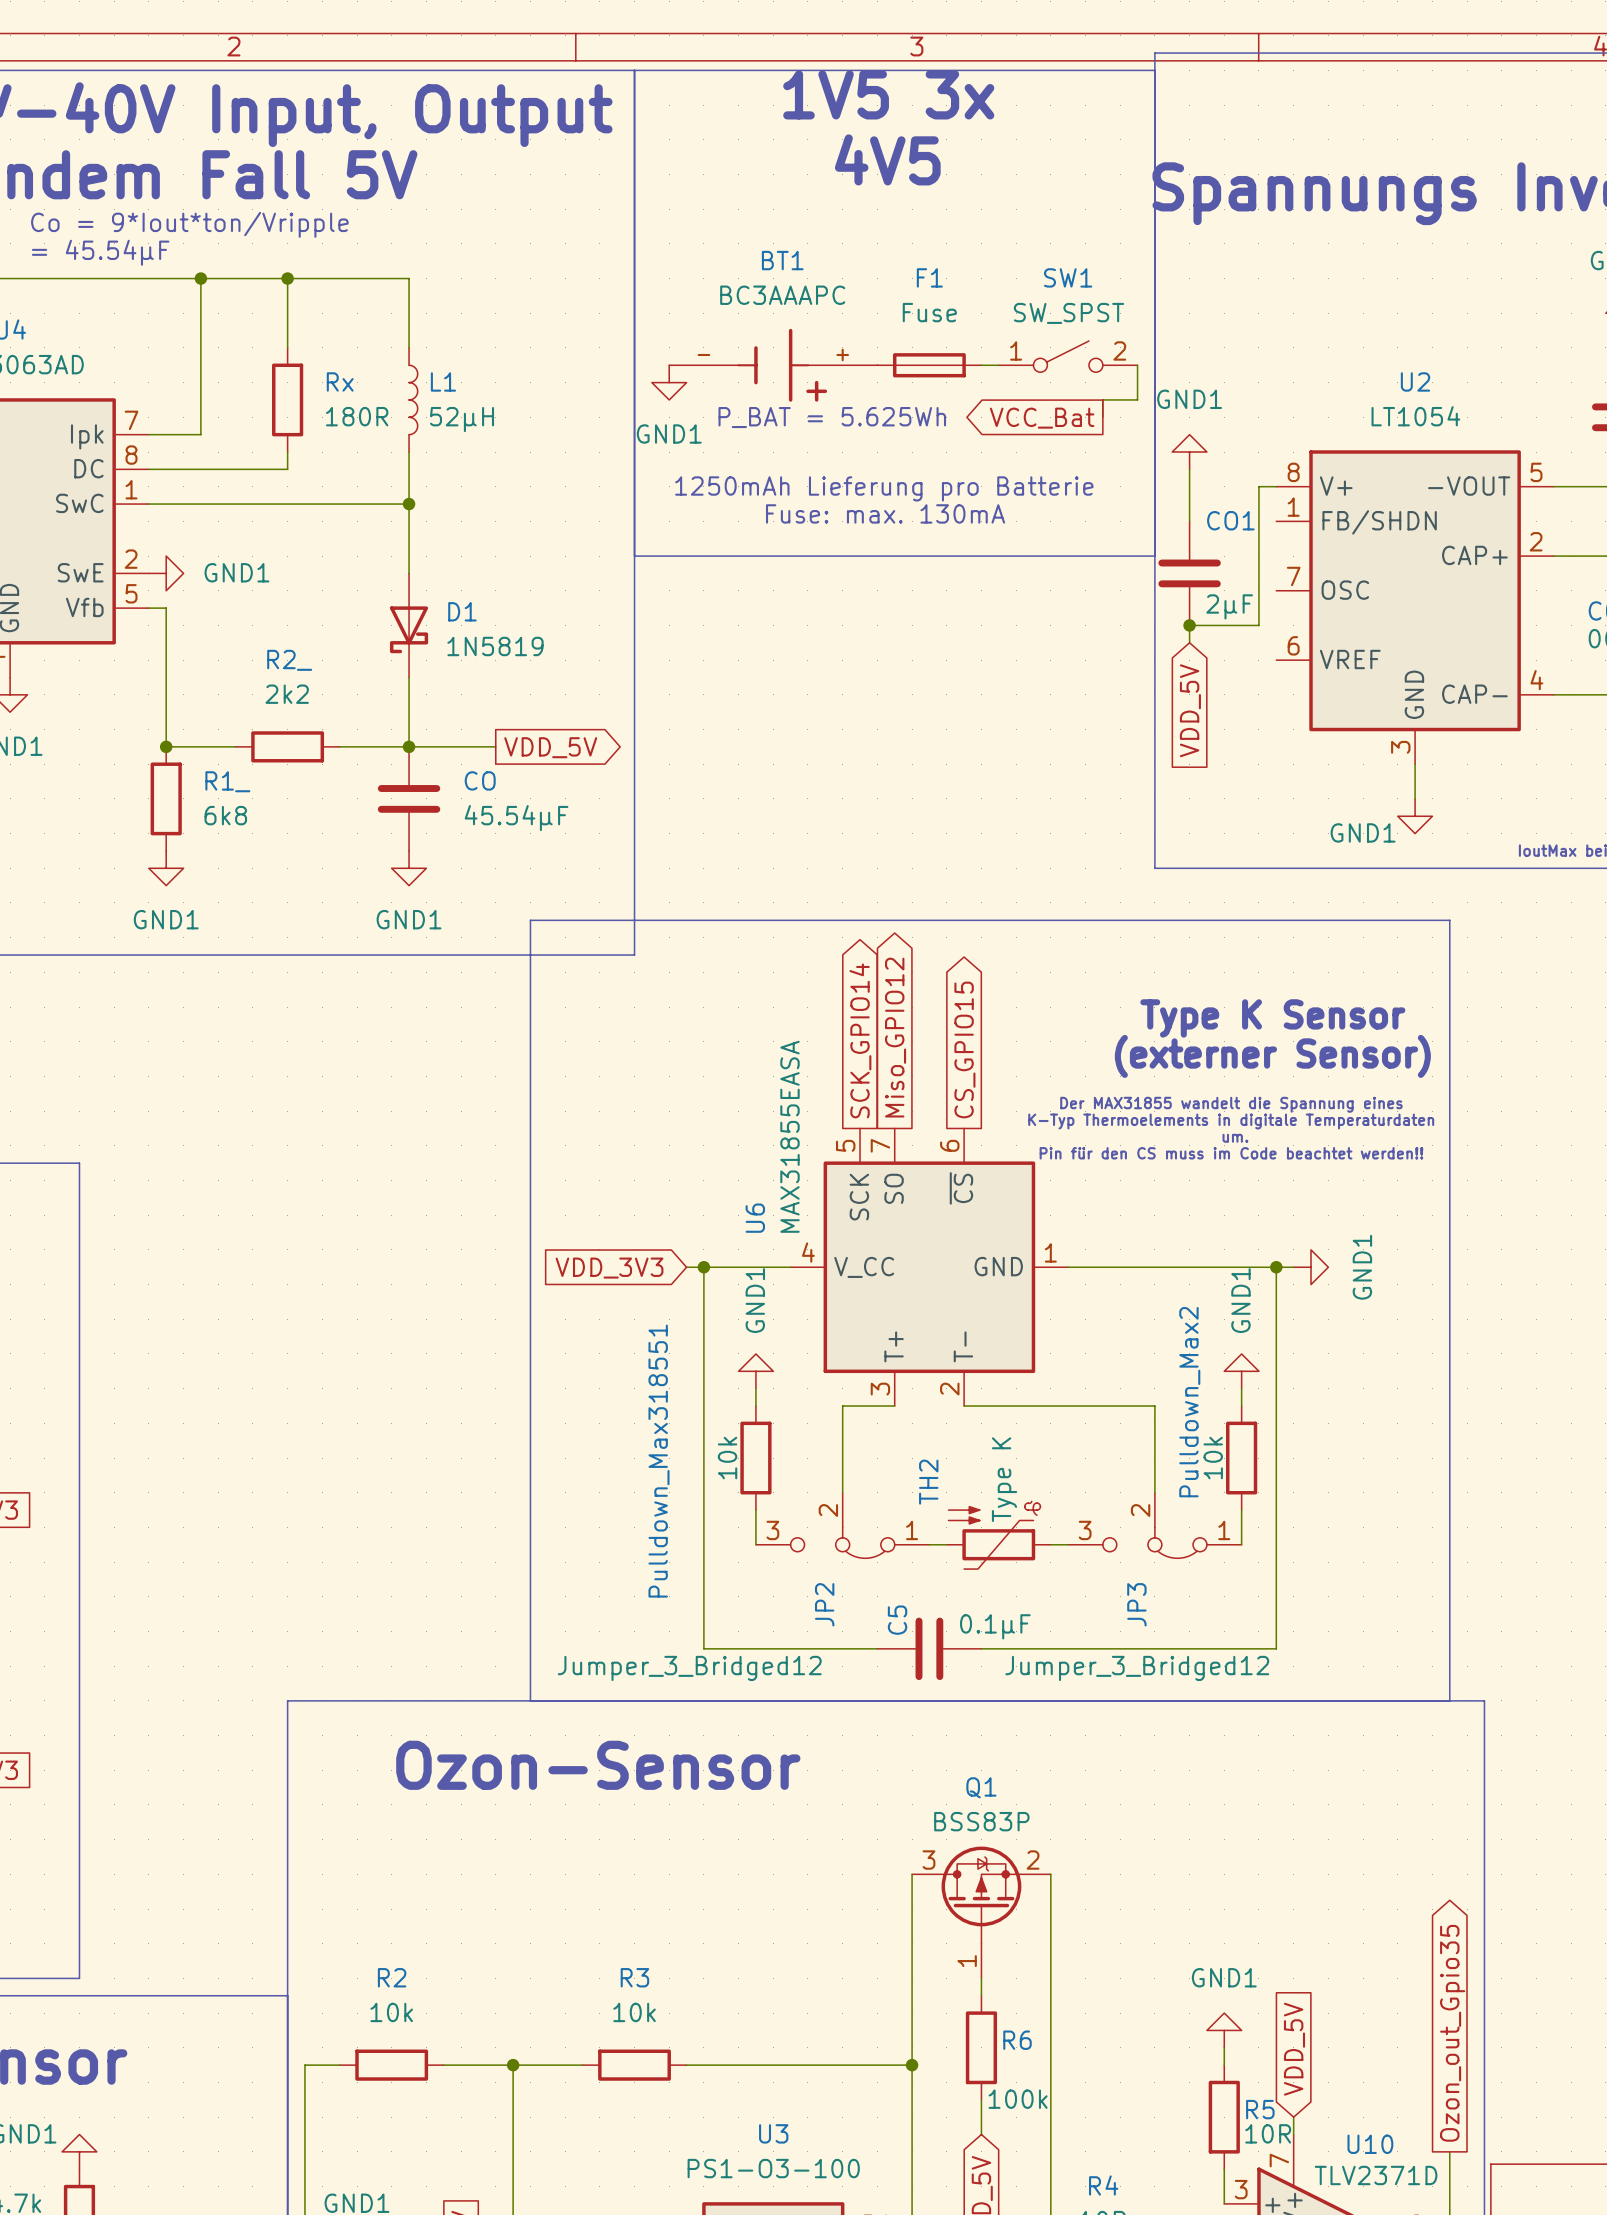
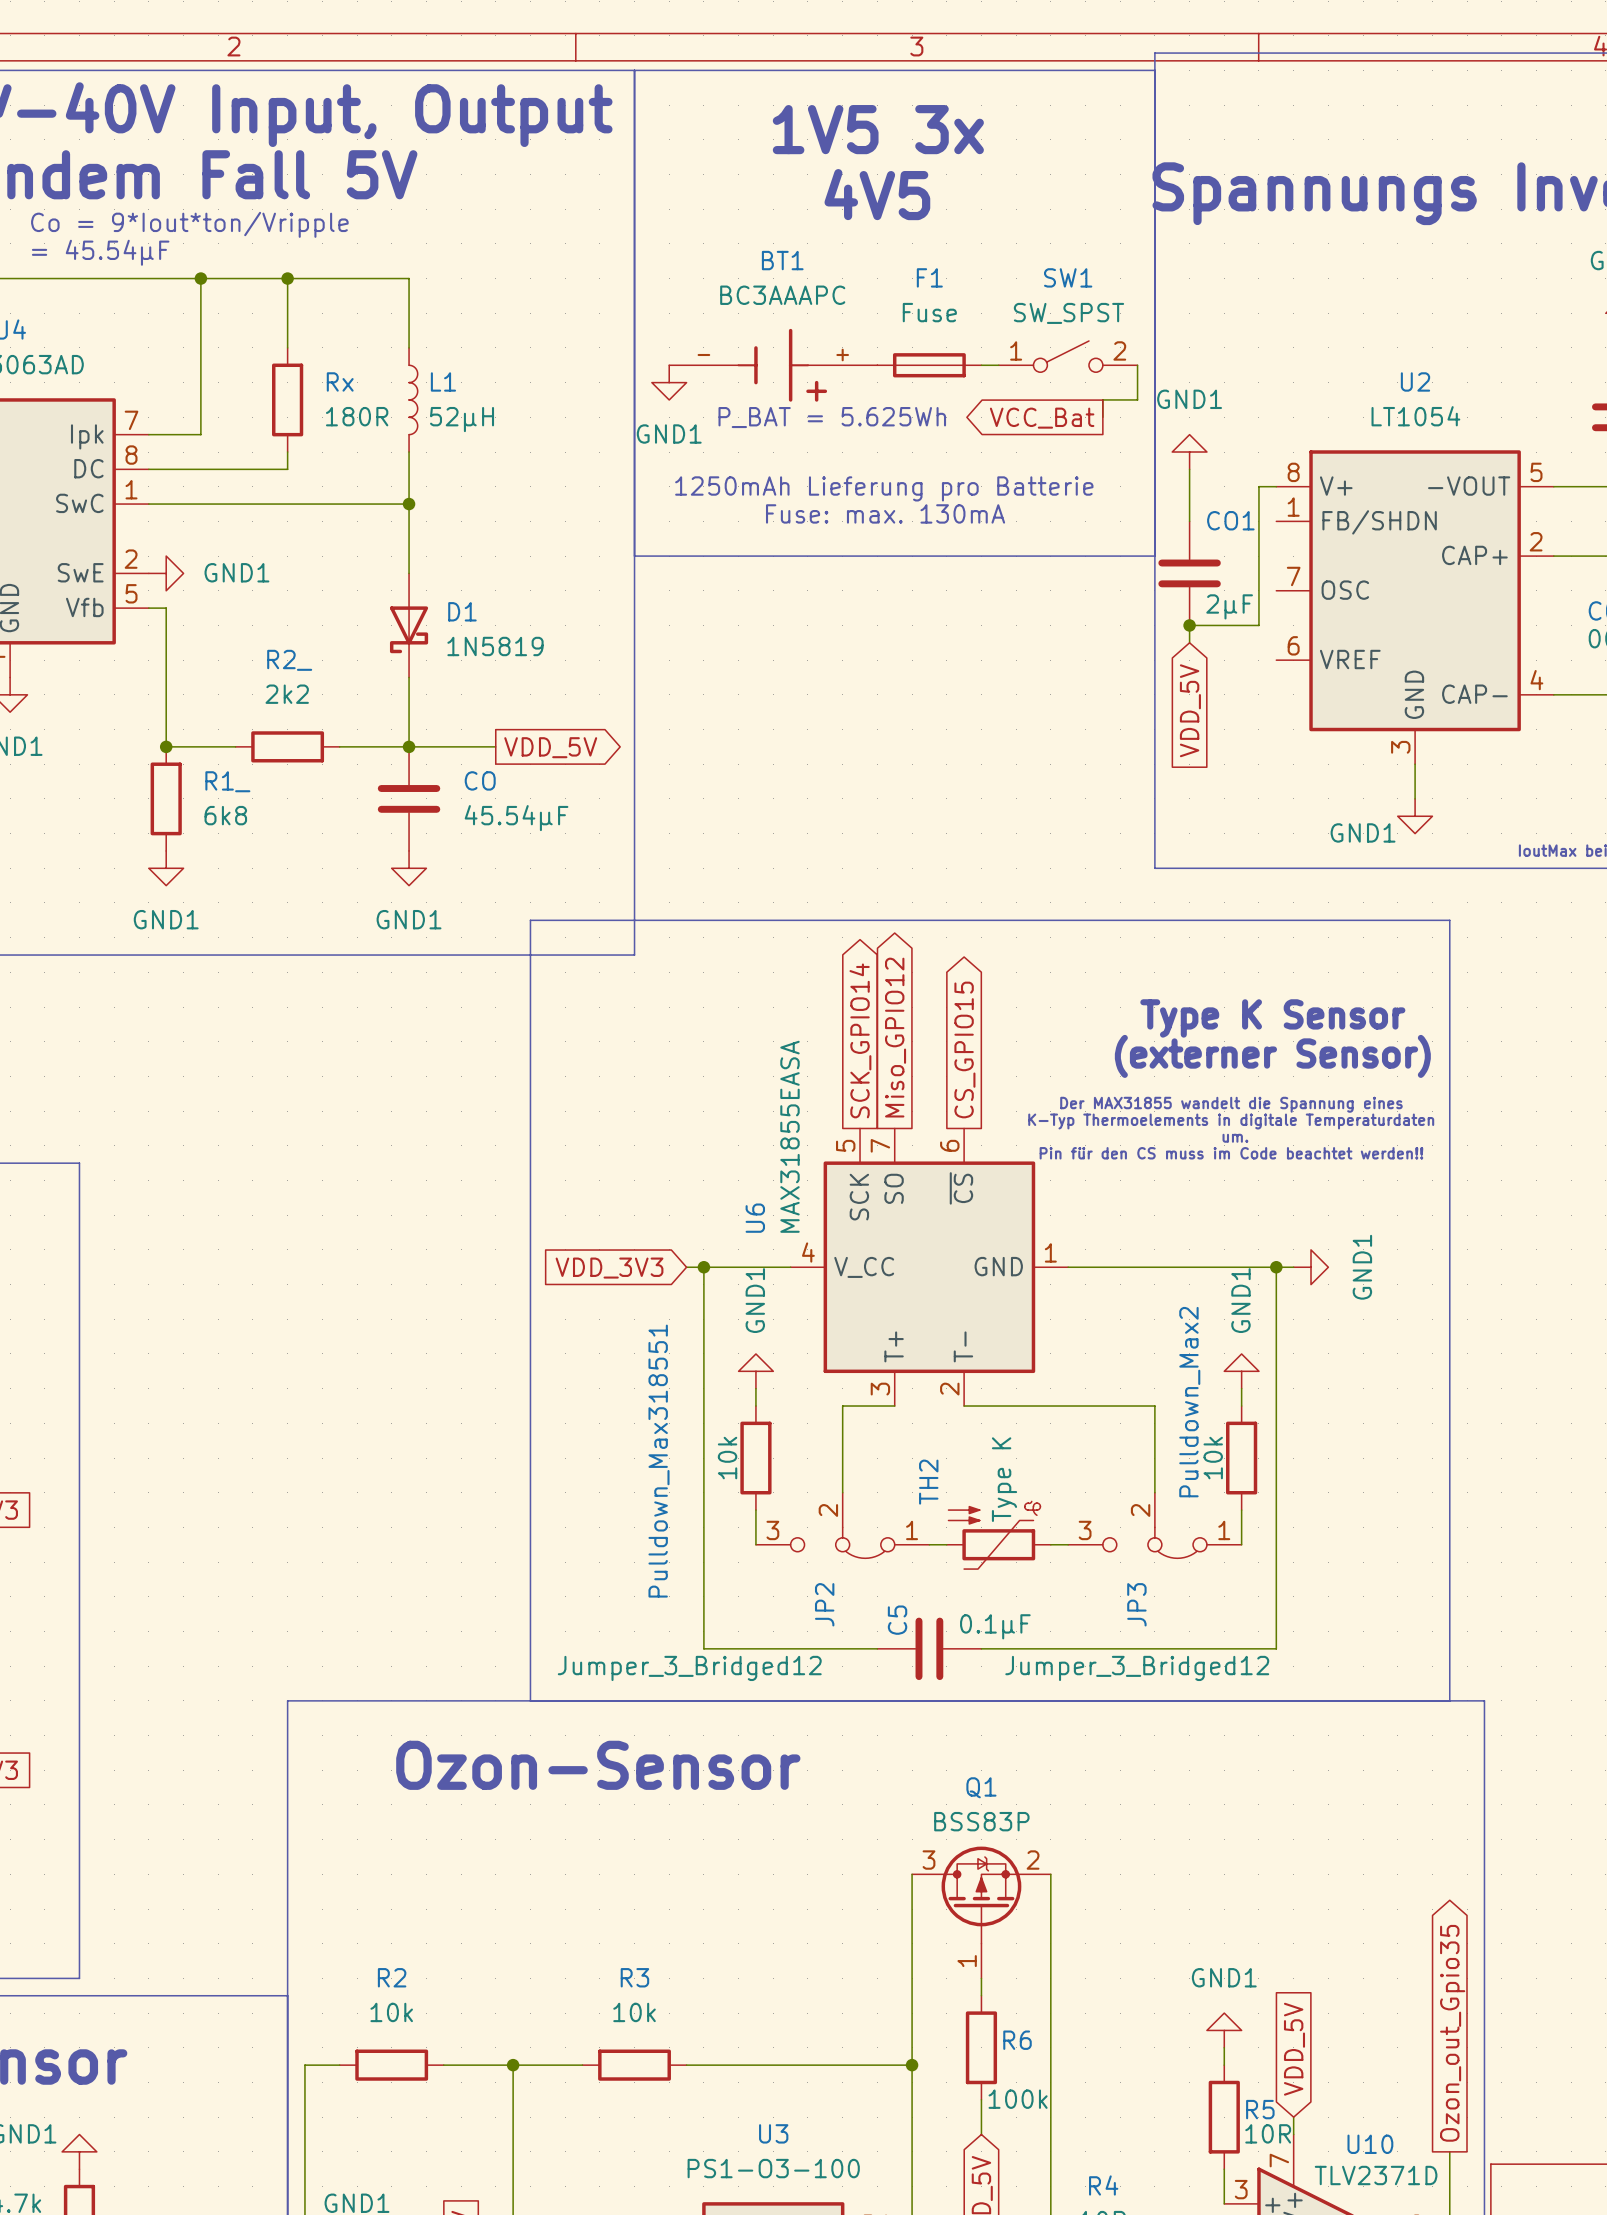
text position: 1V5 3x (888, 94) -> 1V5 3x (878, 129)
text position: 4V5 (887, 159) -> 4V5 (877, 194)

